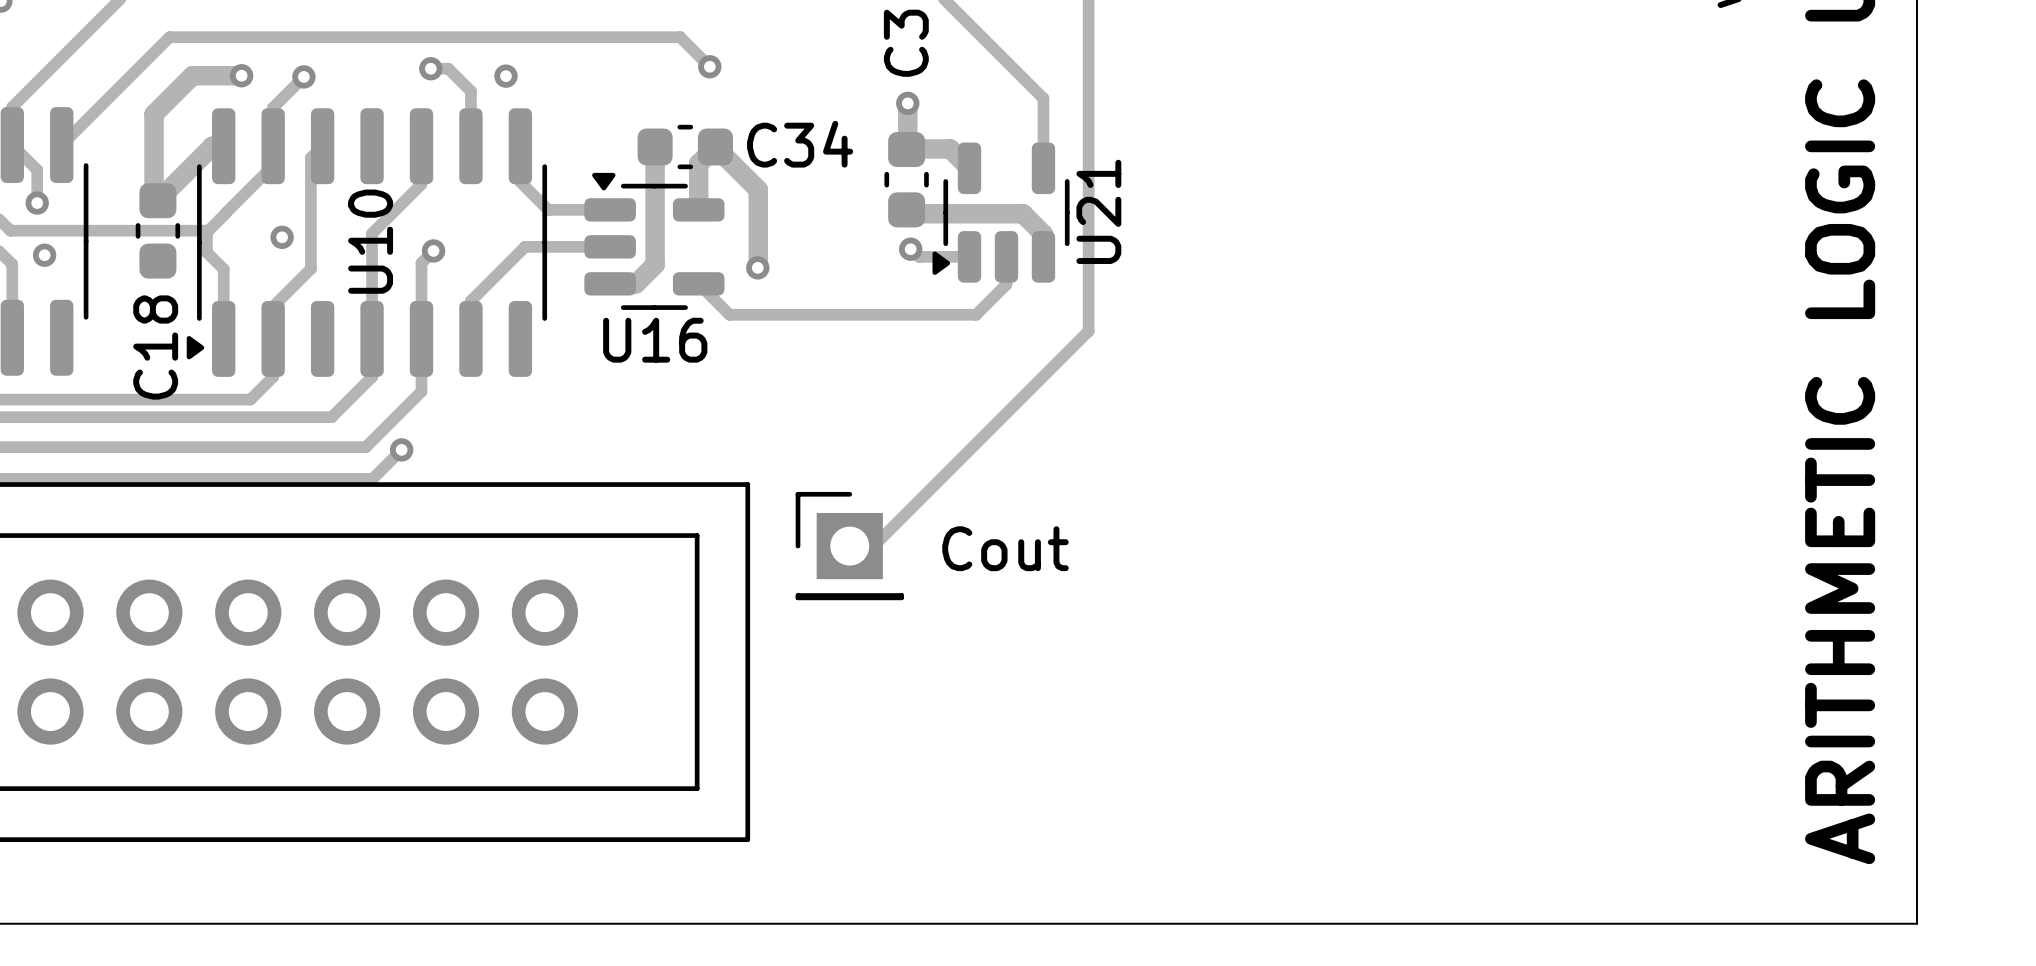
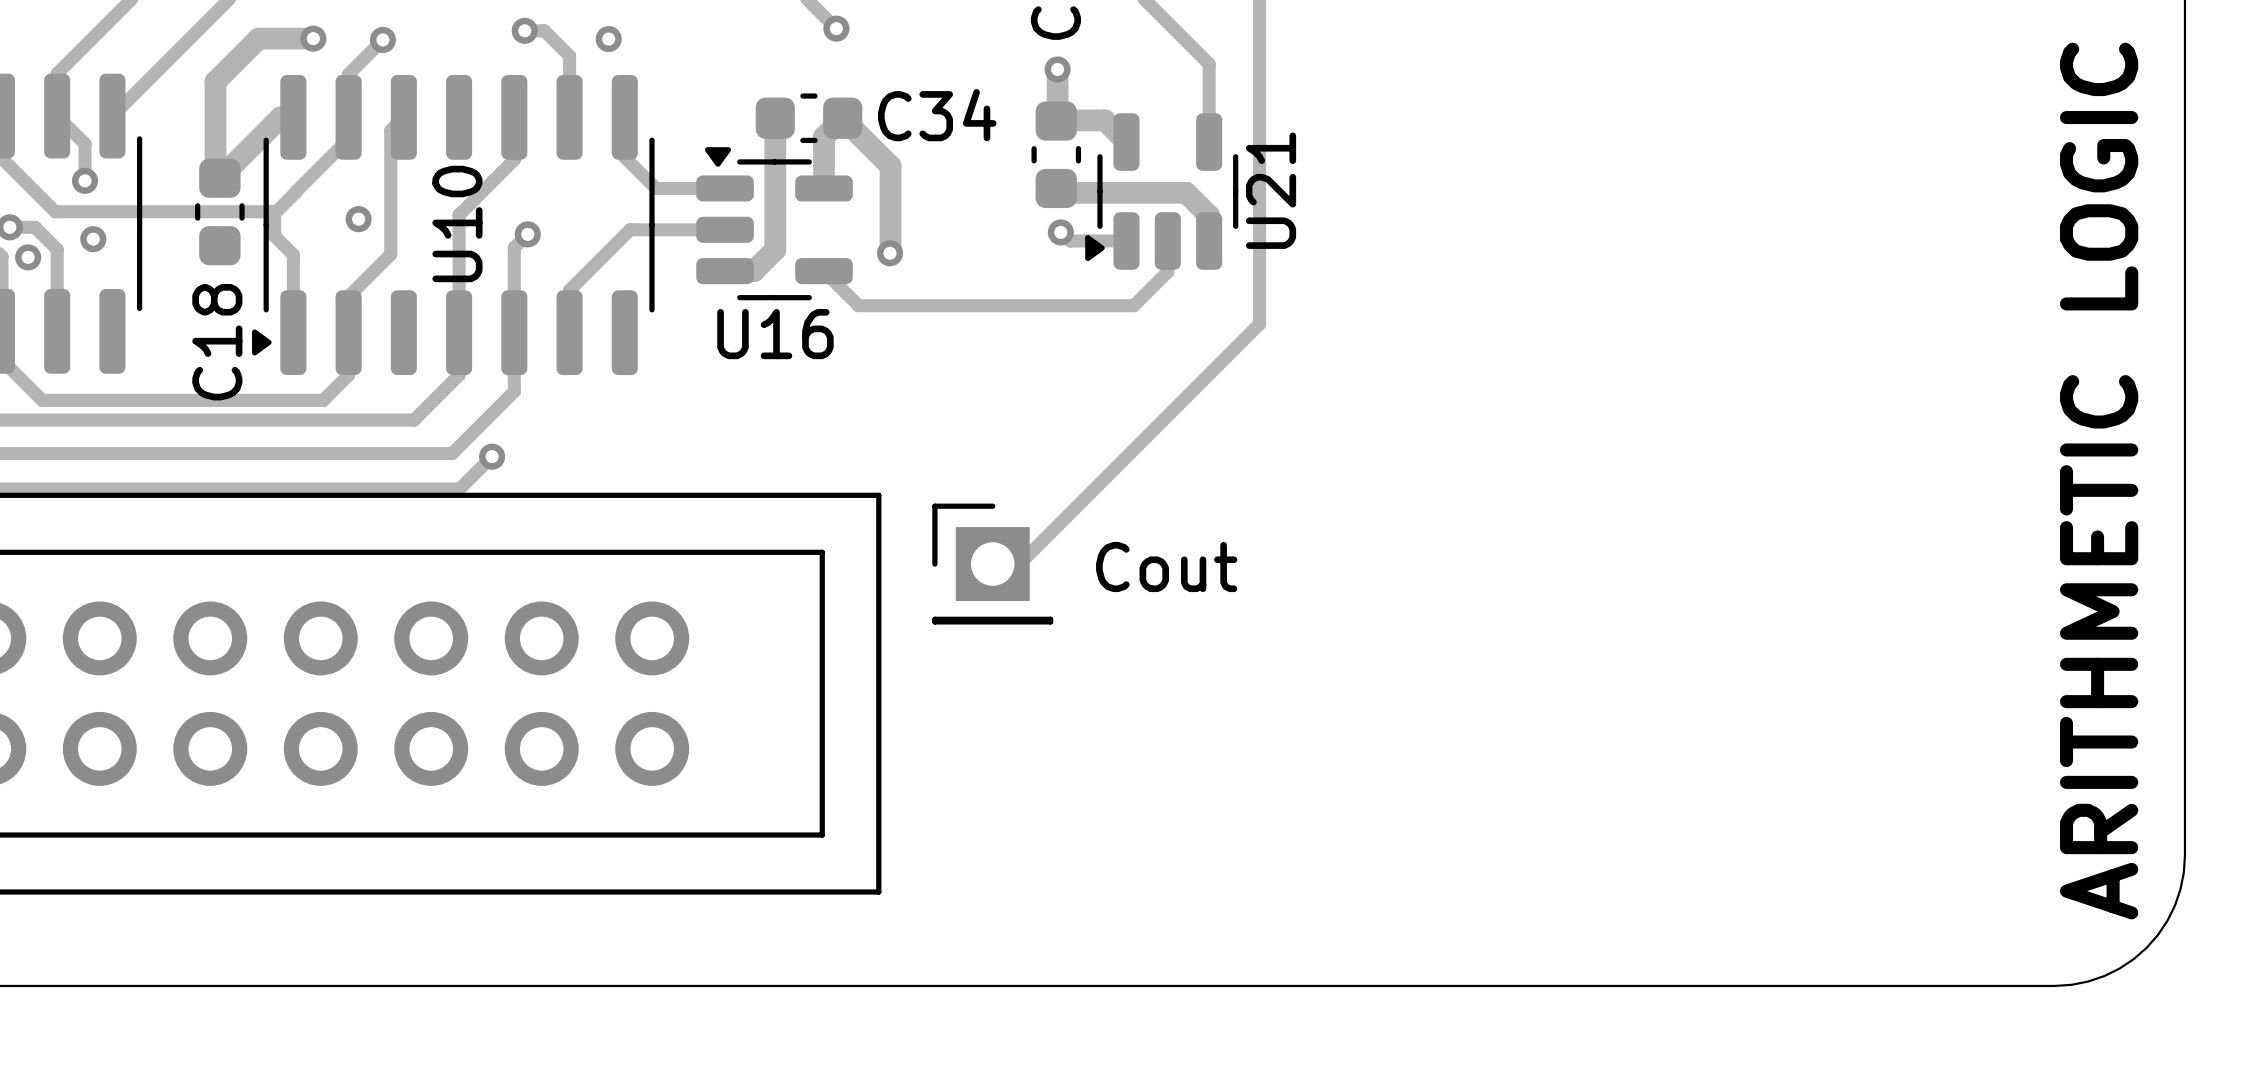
board edge: (1916, 806) (1916, 923) (1800, 923) -> (2184, 855) (2183, 872) (2175, 905) (2167, 920) (2146, 947) (2119, 968) (2104, 976) (2088, 981) (2054, 985)

